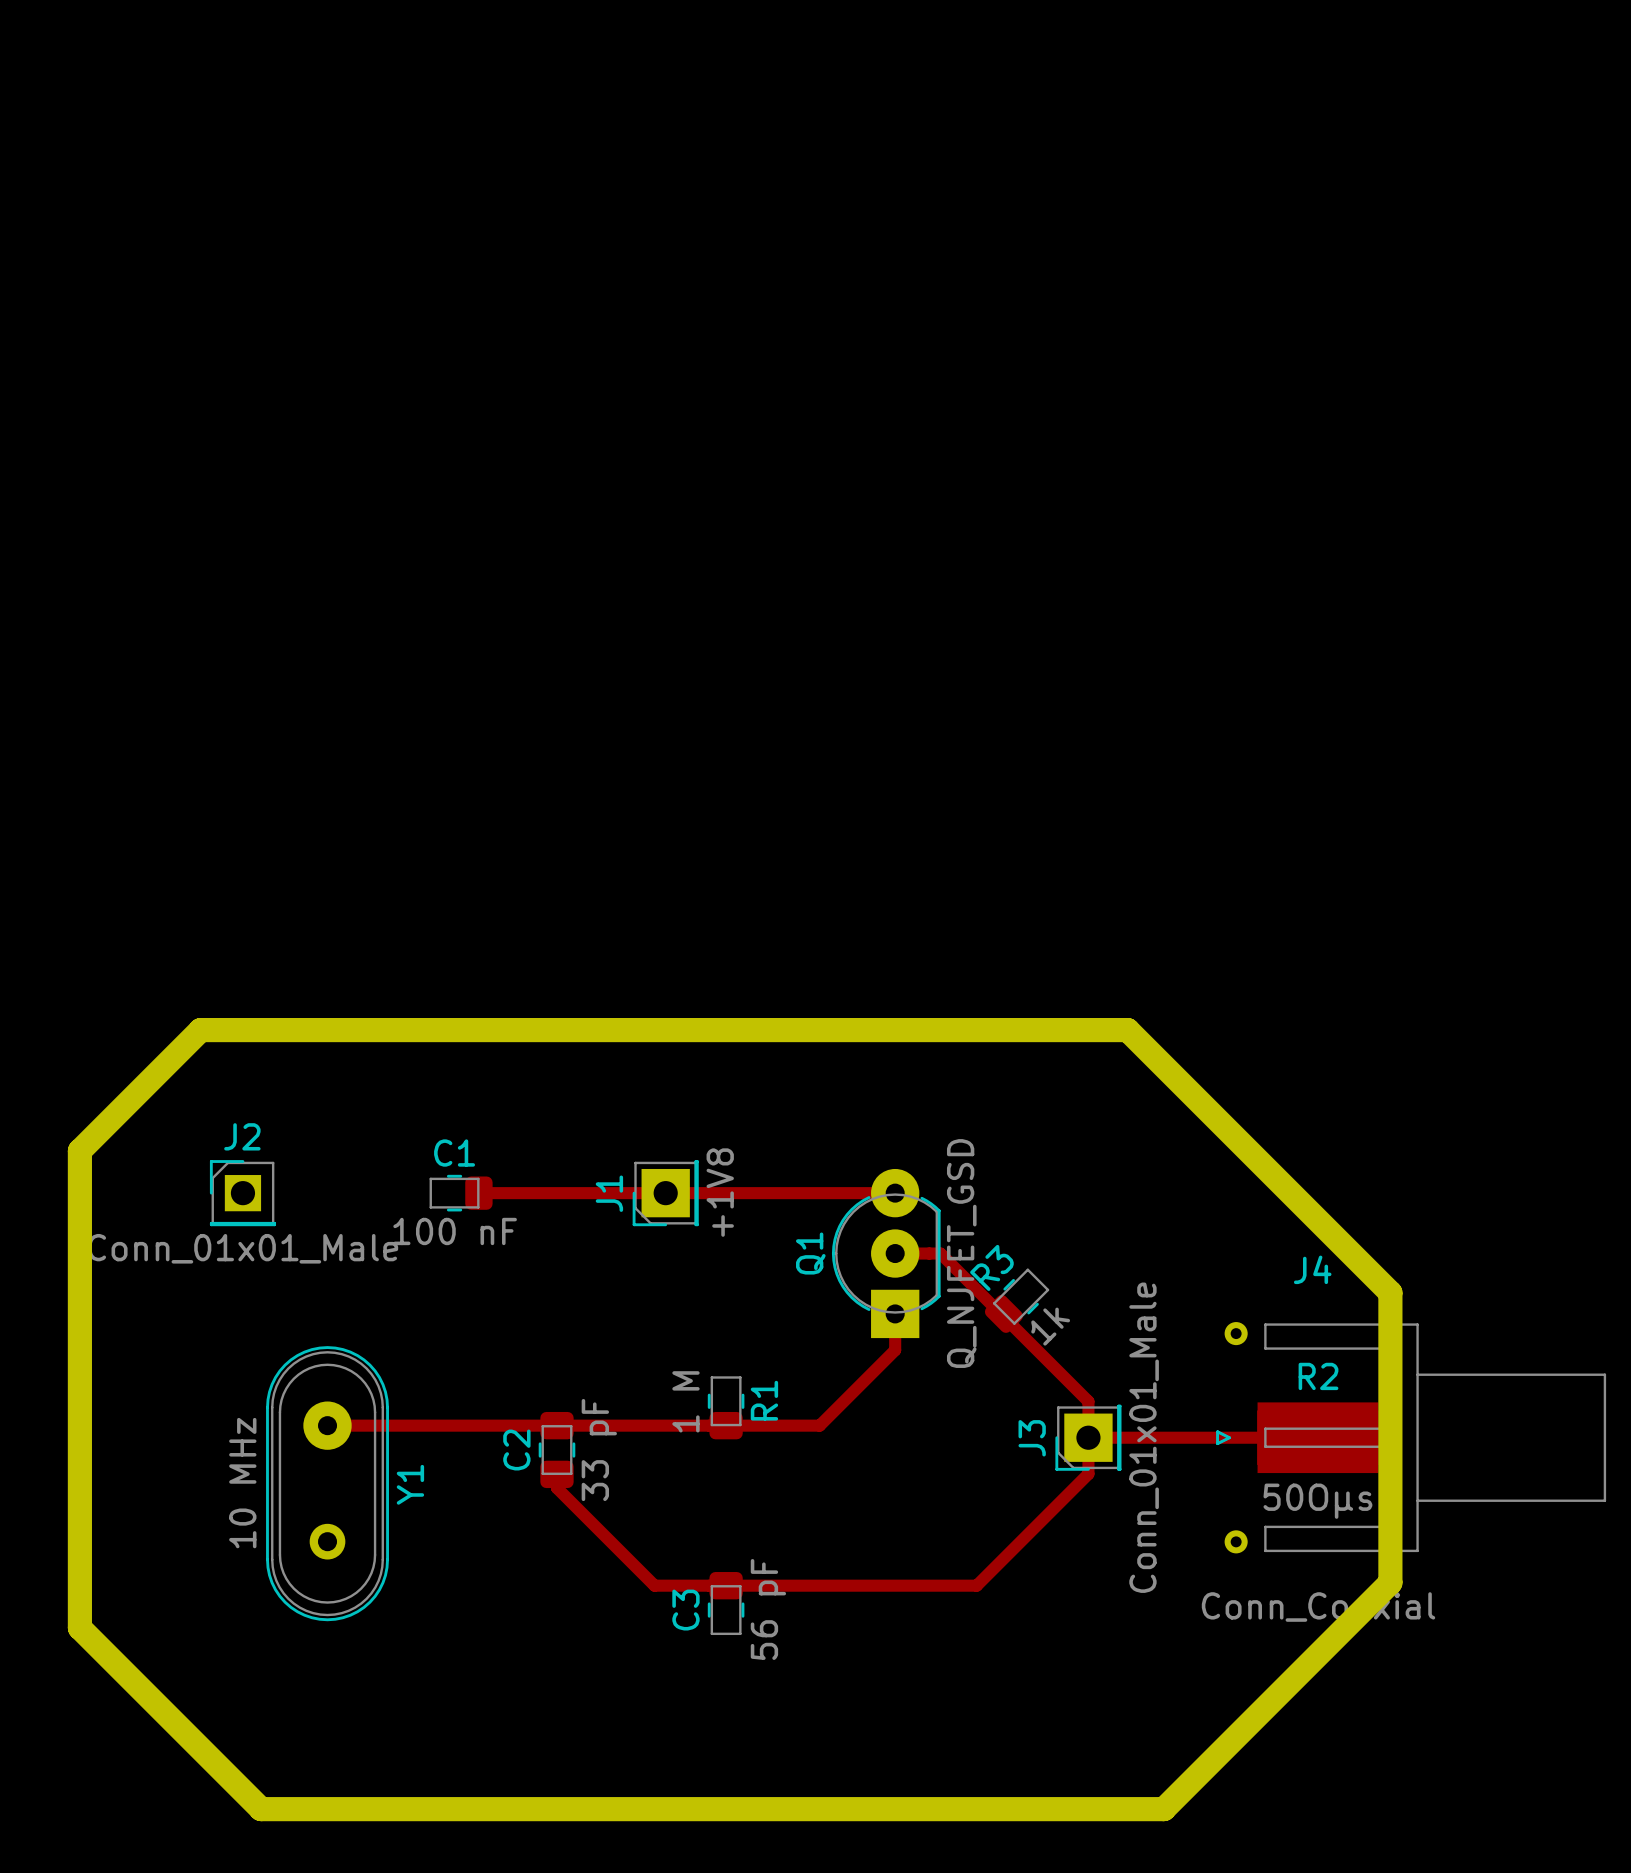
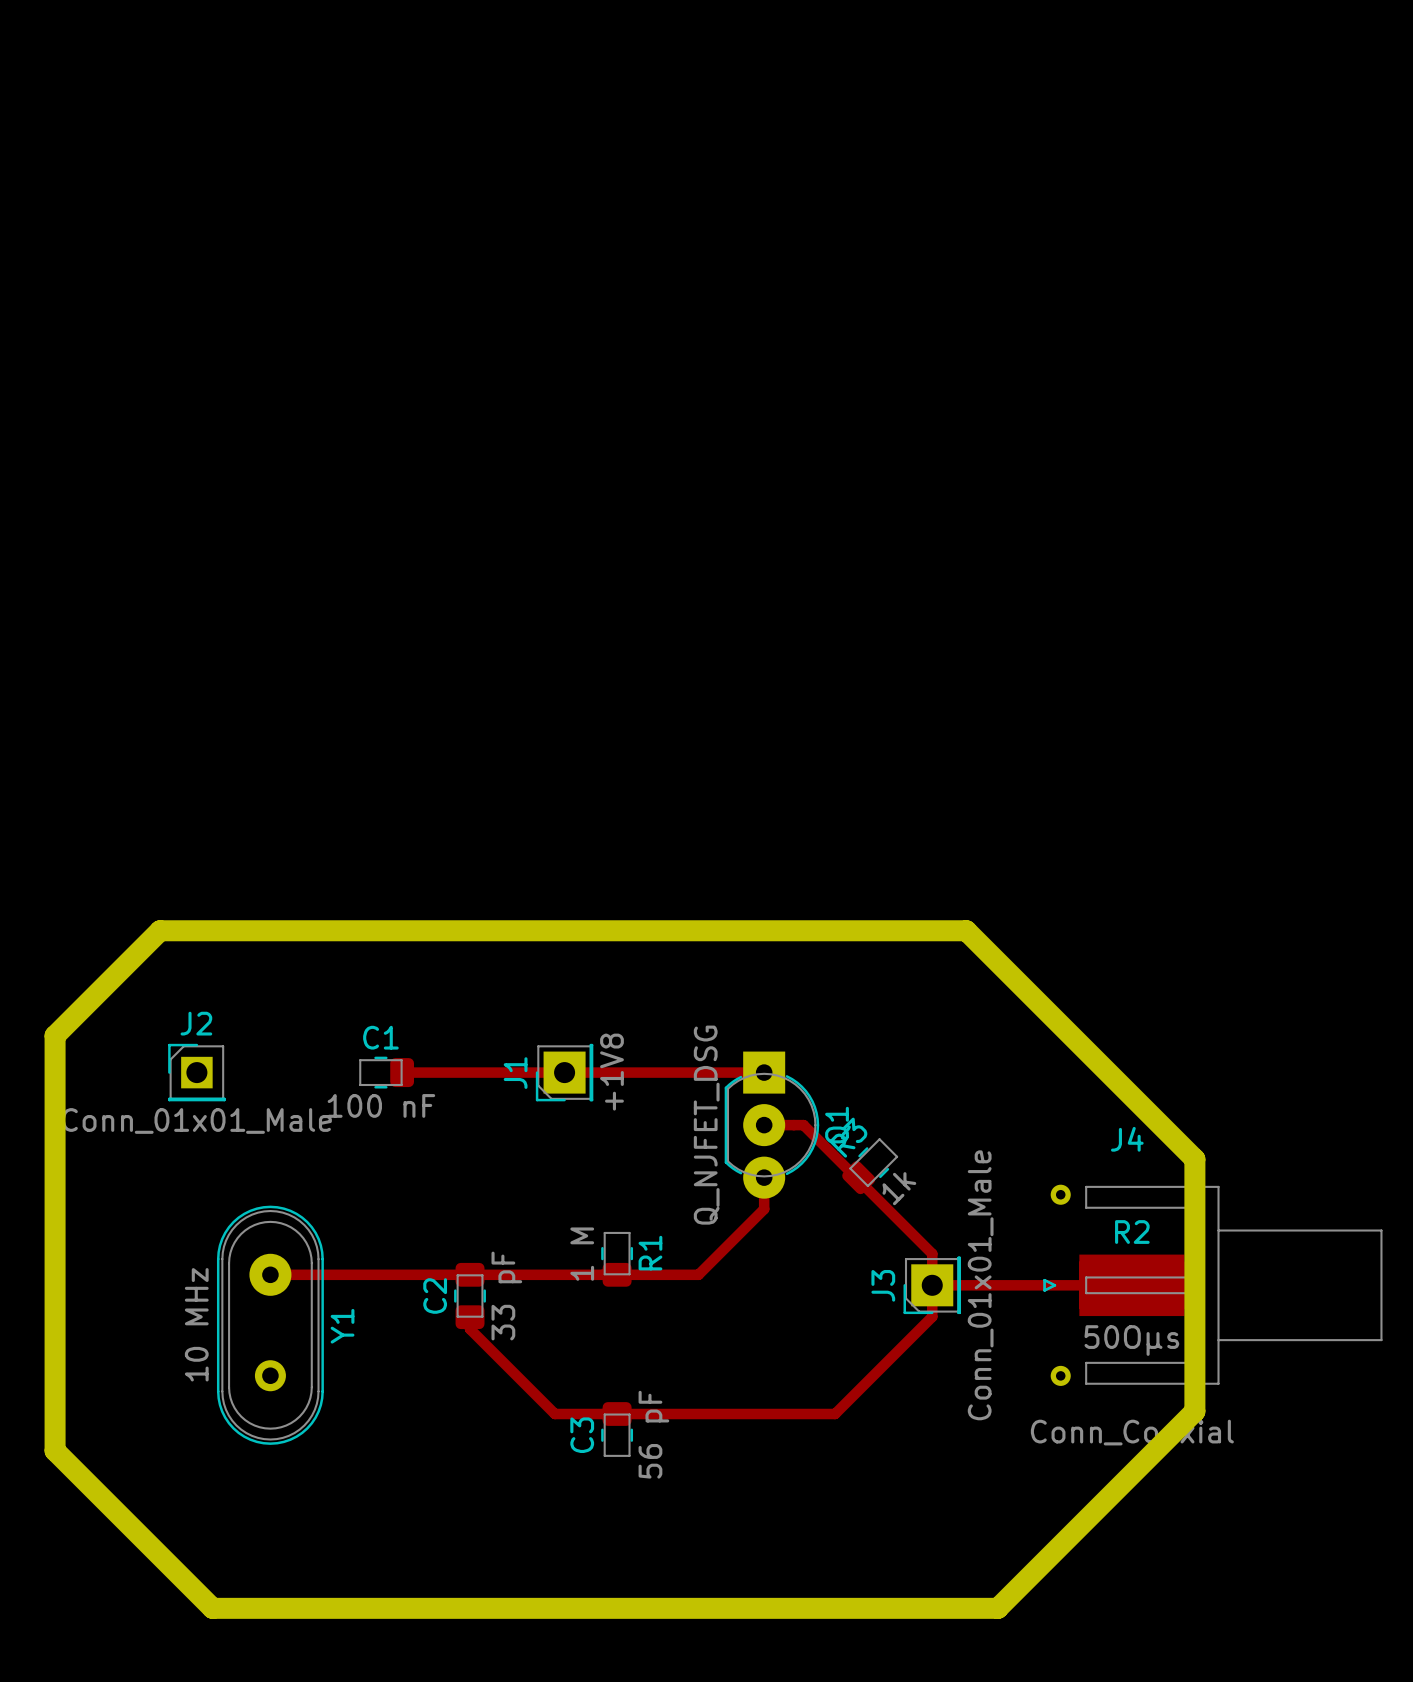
Q1 rotation: 0° (886, 1253) -> 180° (771, 1125)
Q1 value: Q_NJFET_GSD (961, 1253) -> Q_NJFET_DSG (706, 1125)

